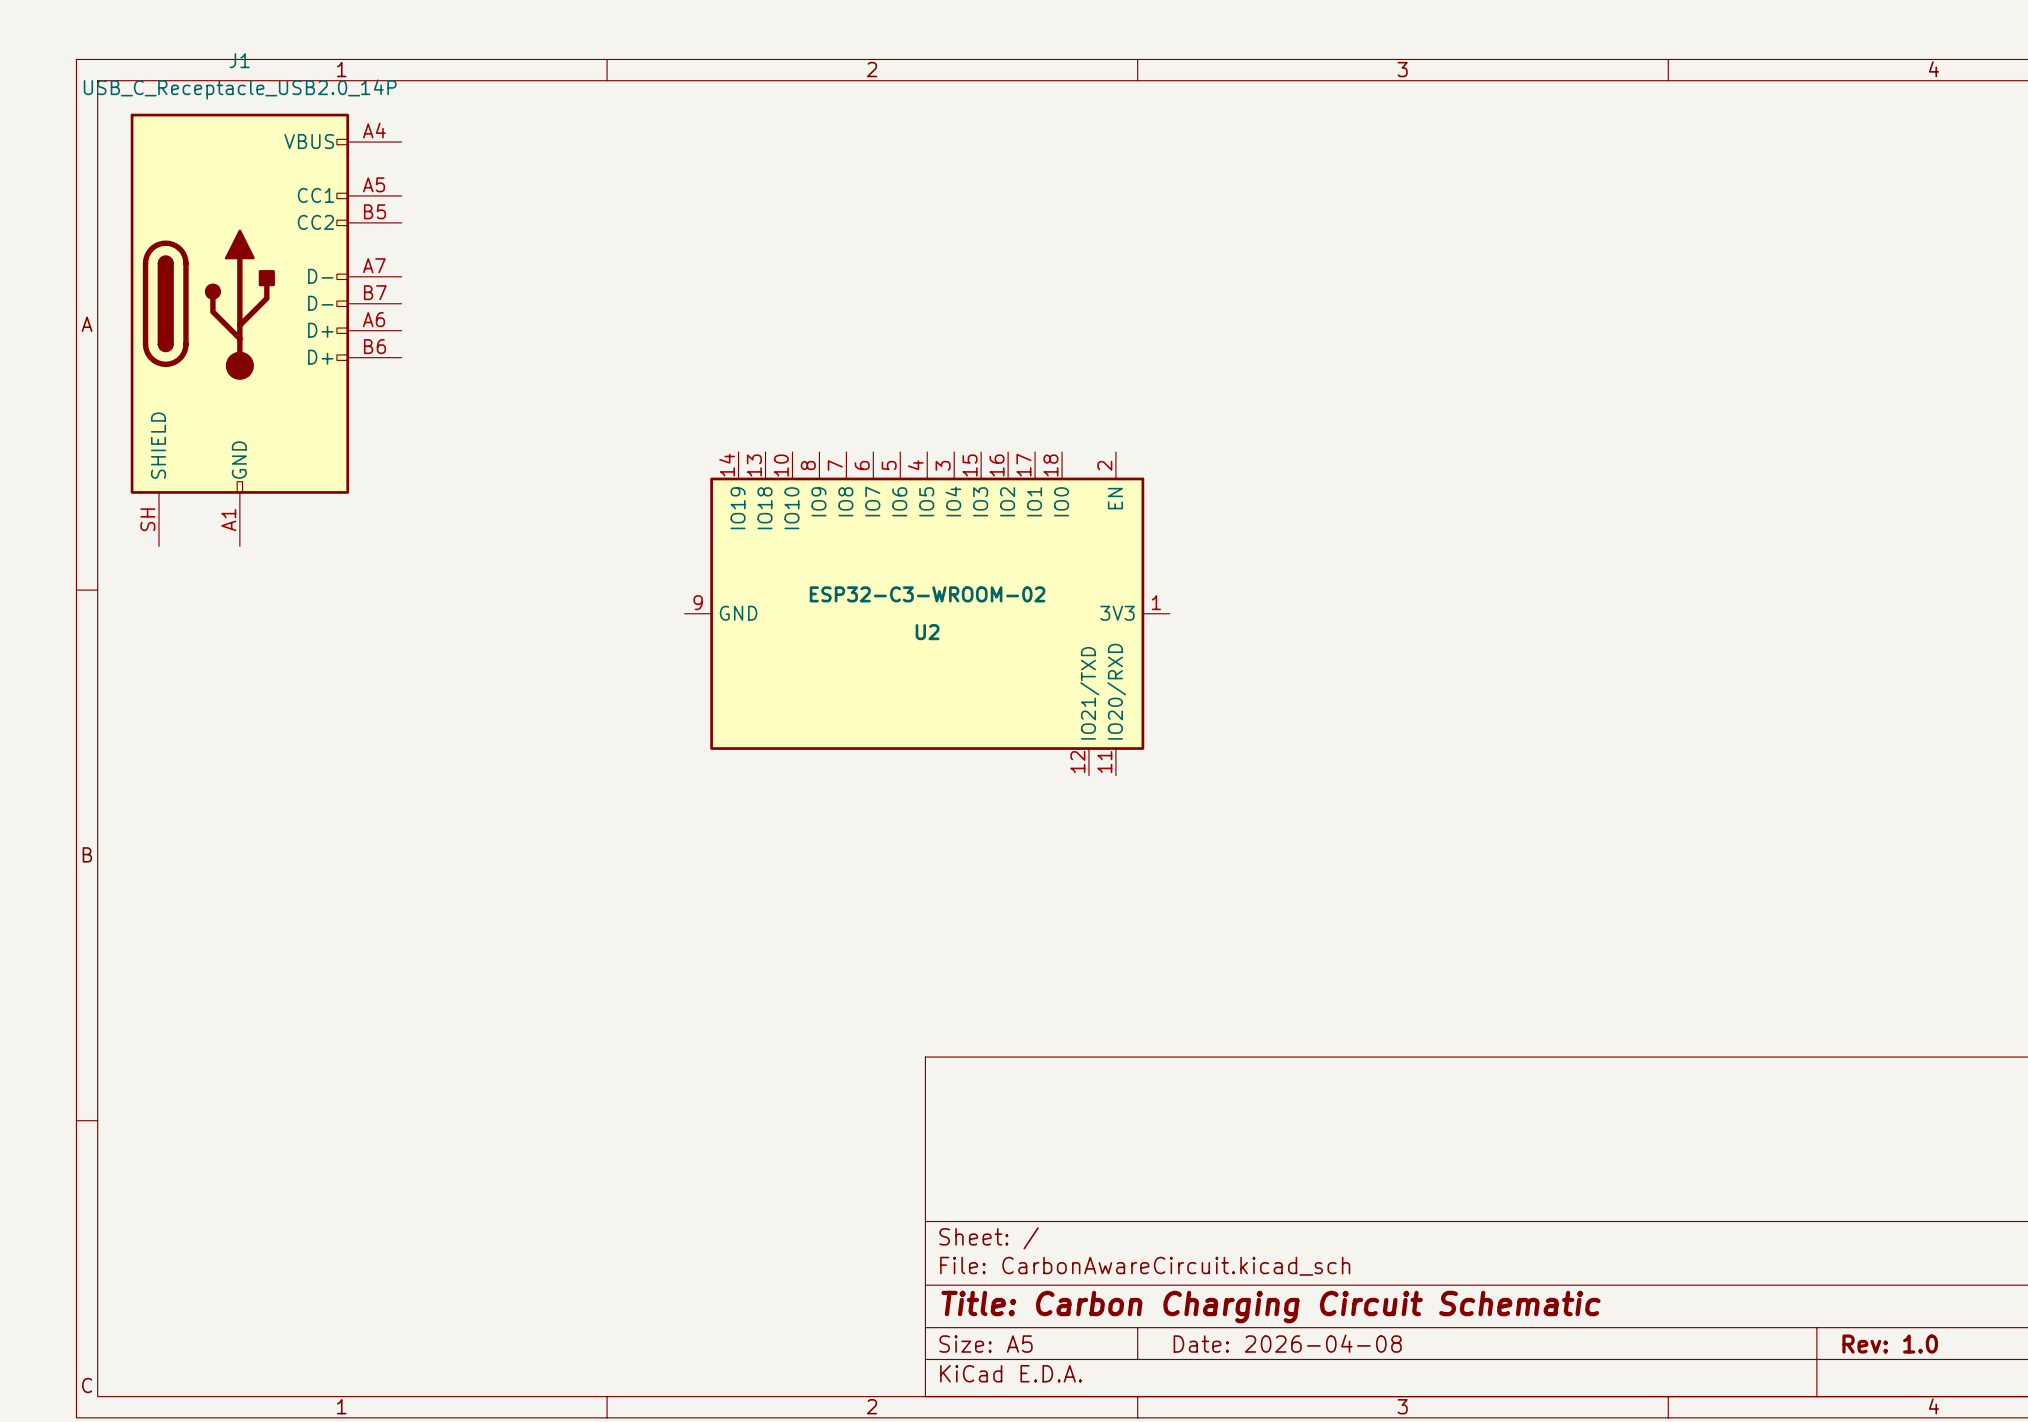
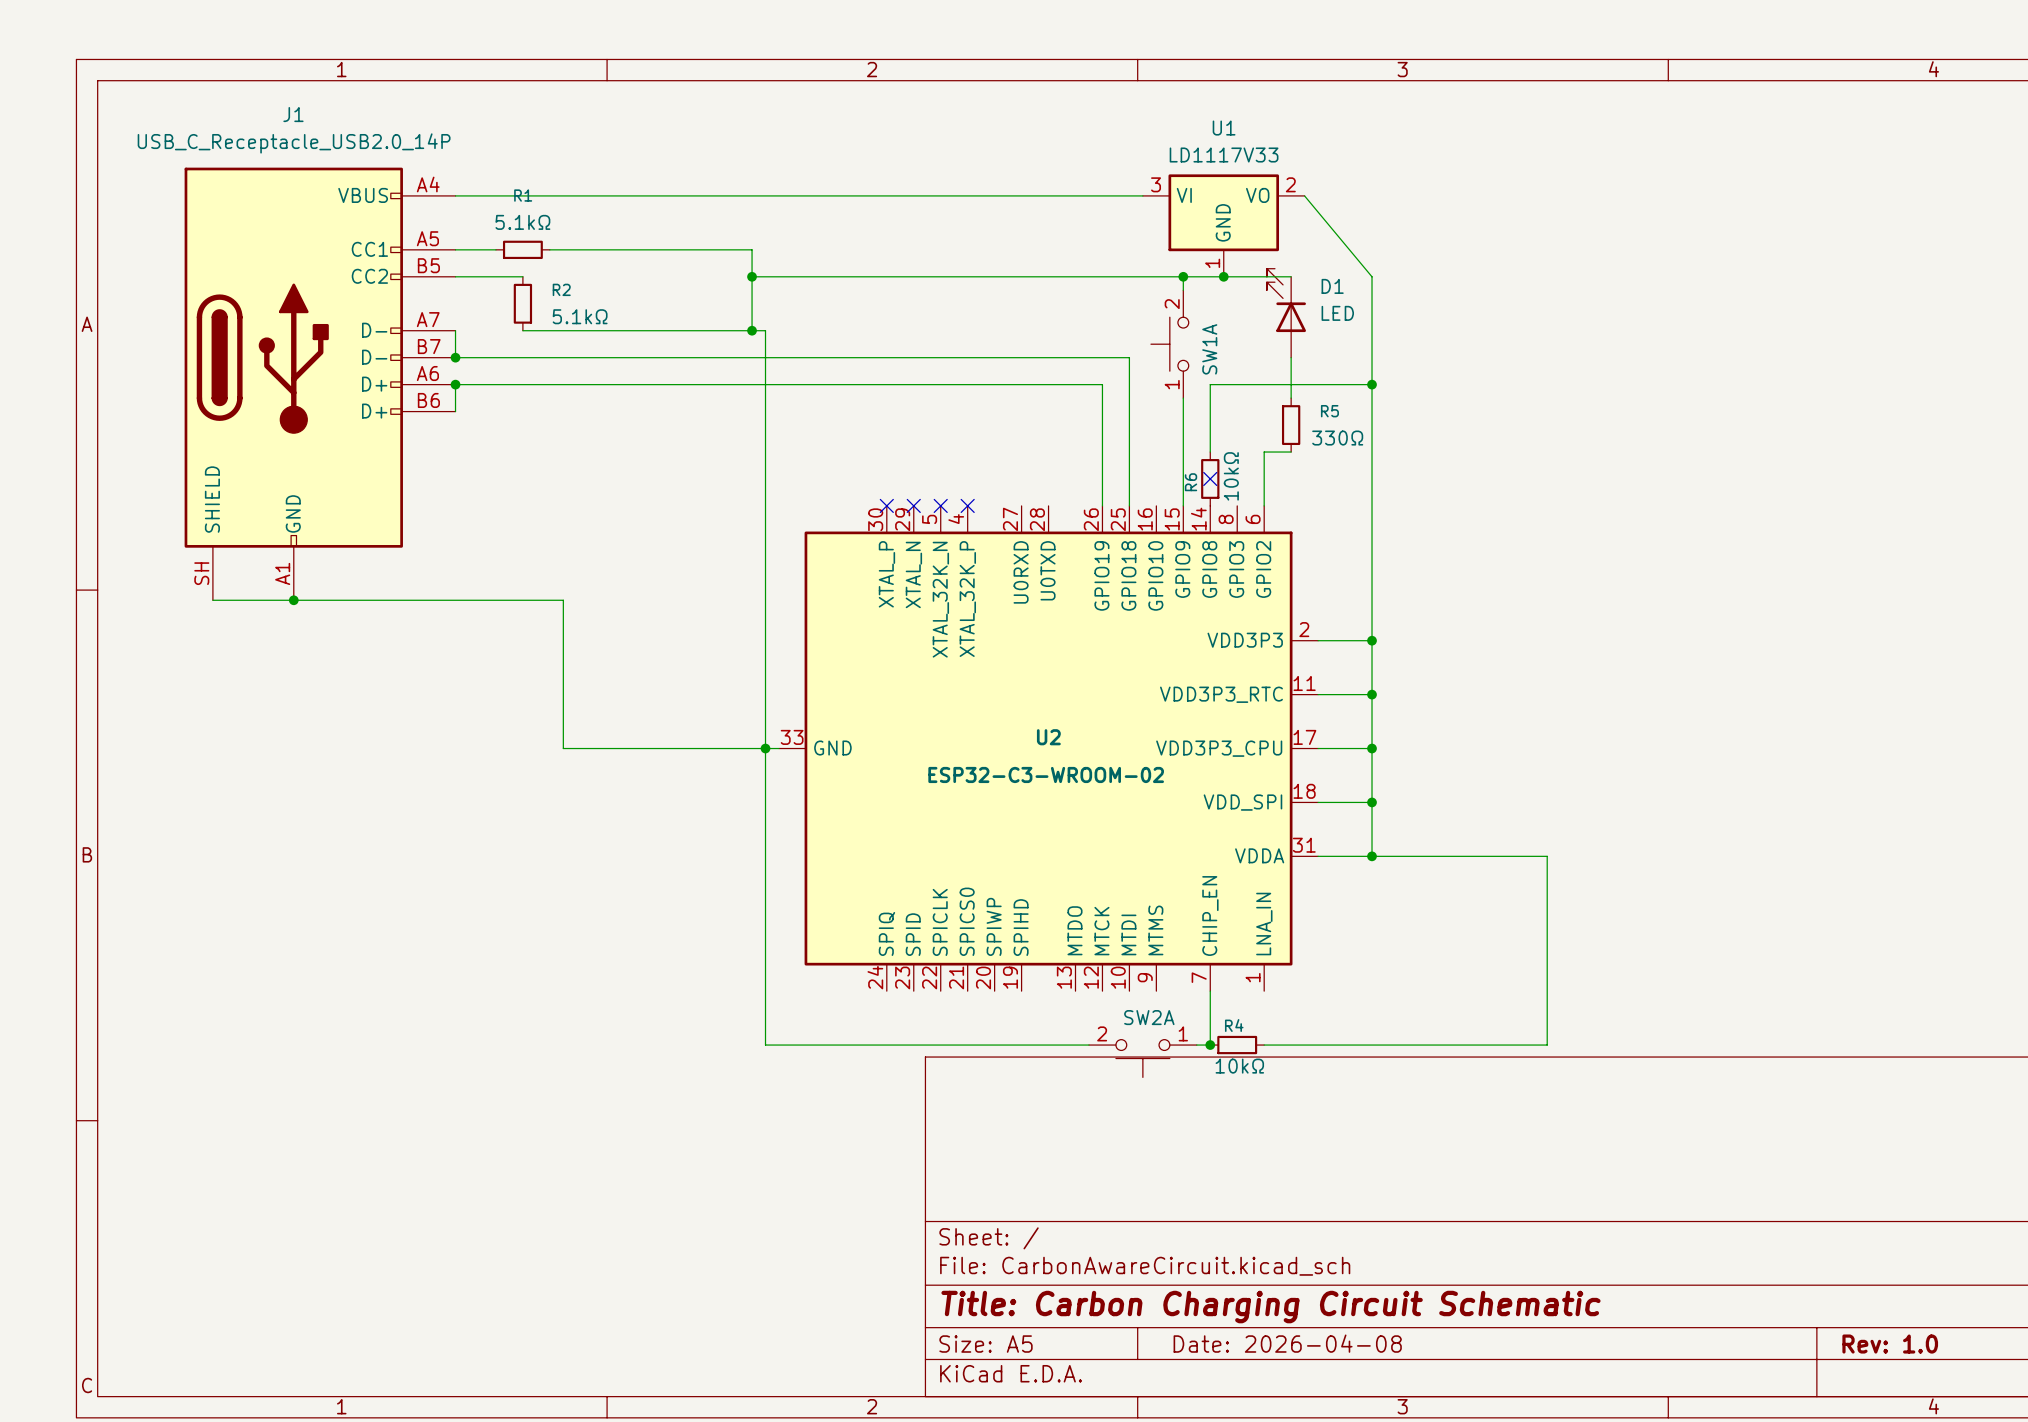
wire: none -> (455, 195) (1142, 195)
wire: none -> (1304, 195) (1372, 276) (1372, 856)
U1: none -> LD1117V33 (1223, 225)
wire: none -> (455, 249) (495, 249)
R1: none -> 5.1kΩ (522, 249)
wire: none -> (549, 249) (752, 249) (752, 330)
wire: none -> (455, 276) (522, 276)
wire: none -> (752, 276) (1291, 276)
junction: none -> (752, 276)
wire: none -> (1183, 276) (1183, 290)
junction: none -> (1183, 276)
junction: none -> (1223, 276)
R2: none -> 5.1kΩ (522, 303)
D1: none -> LED (1286, 313)
J1 position: (266, 330) -> (320, 383)
wire: none -> (455, 330) (455, 357) (1129, 357) (1129, 505)
wire: none -> (522, 330) (765, 330) (765, 1045) (1088, 1045)
junction: none -> (752, 330)
SW1A: none -> (1169, 344)
junction: none -> (455, 357)
wire: none -> (1291, 357) (1291, 398)
junction: none -> (455, 384)
wire: none -> (1372, 384) (1210, 384) (1210, 452)
junction: none -> (1372, 384)
wire: none -> (1183, 398) (1183, 505)
wire: none -> (455, 411) (455, 384) (1102, 384) (1102, 505)
R5: none -> 330Ω (1291, 425)
U2 symbol: [684, 452, 1170, 776] -> [778, 505, 1319, 992]
wire: none -> (1291, 452) (1264, 452) (1264, 505)
R6: none -> 10kΩ (1210, 478)
no-connect mark: none -> (1210, 478)
no-connect mark: none -> (886, 505)
no-connect mark: none -> (913, 505)
no-connect mark: none -> (940, 505)
no-connect mark: none -> (967, 505)
U2 value position: ESP32-C3-WROOM-02 (927, 594) -> ESP32-C3-WROOM-02 (1046, 774)
wire: none -> (212, 600) (563, 600) (563, 748) (778, 748)
junction: none -> (293, 600)
U2 name position: U2 (927, 632) -> U2 (1048, 737)
wire: none -> (1318, 640) (1372, 640)
junction: none -> (1372, 640)
wire: none -> (1318, 694) (1372, 694)
junction: none -> (1372, 694)
junction: none -> (765, 748)
wire: none -> (1318, 748) (1372, 748)
junction: none -> (1372, 748)
wire: none -> (1318, 802) (1372, 802)
junction: none -> (1372, 802)
wire: none -> (1318, 856) (1547, 856) (1547, 1045) (1264, 1045)
junction: none -> (1372, 856)
wire: none -> (1210, 991) (1210, 1045) (1196, 1045)
junction: none -> (1210, 1045)
R4: none -> 10kΩ (1237, 1045)
SW2A: none -> (1142, 1058)

